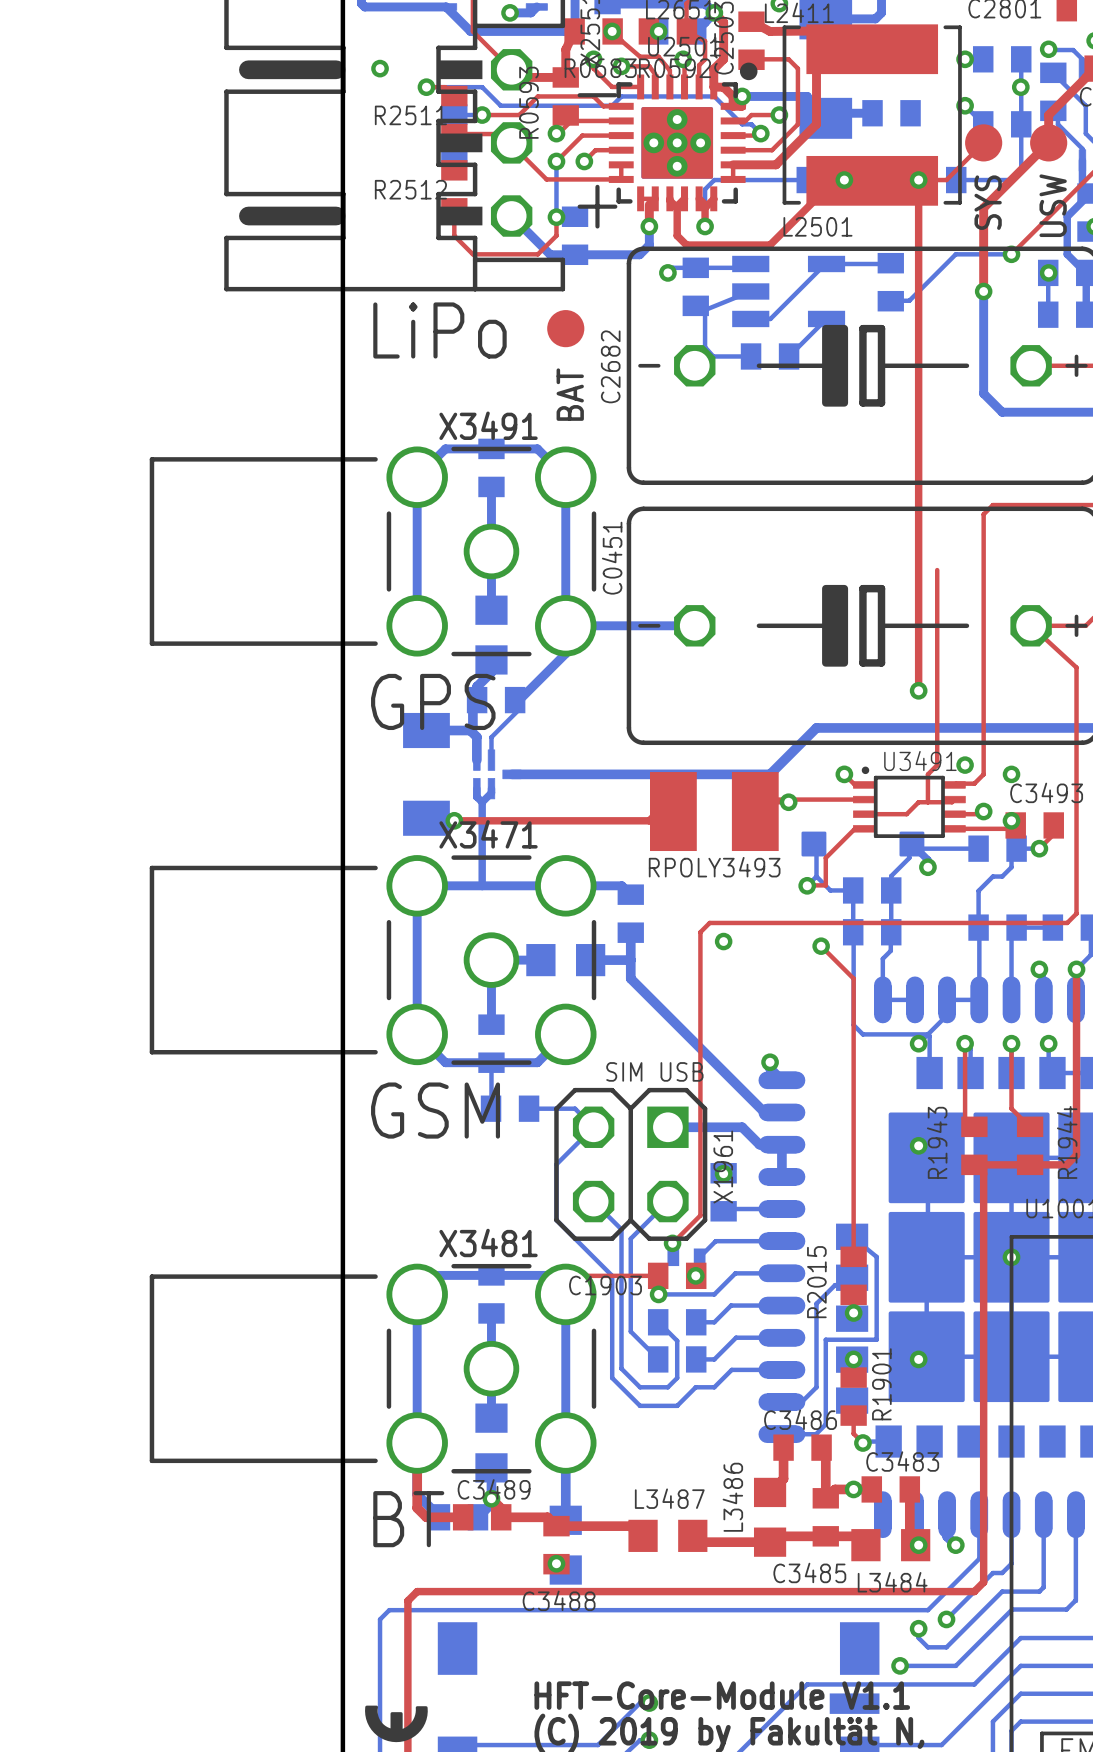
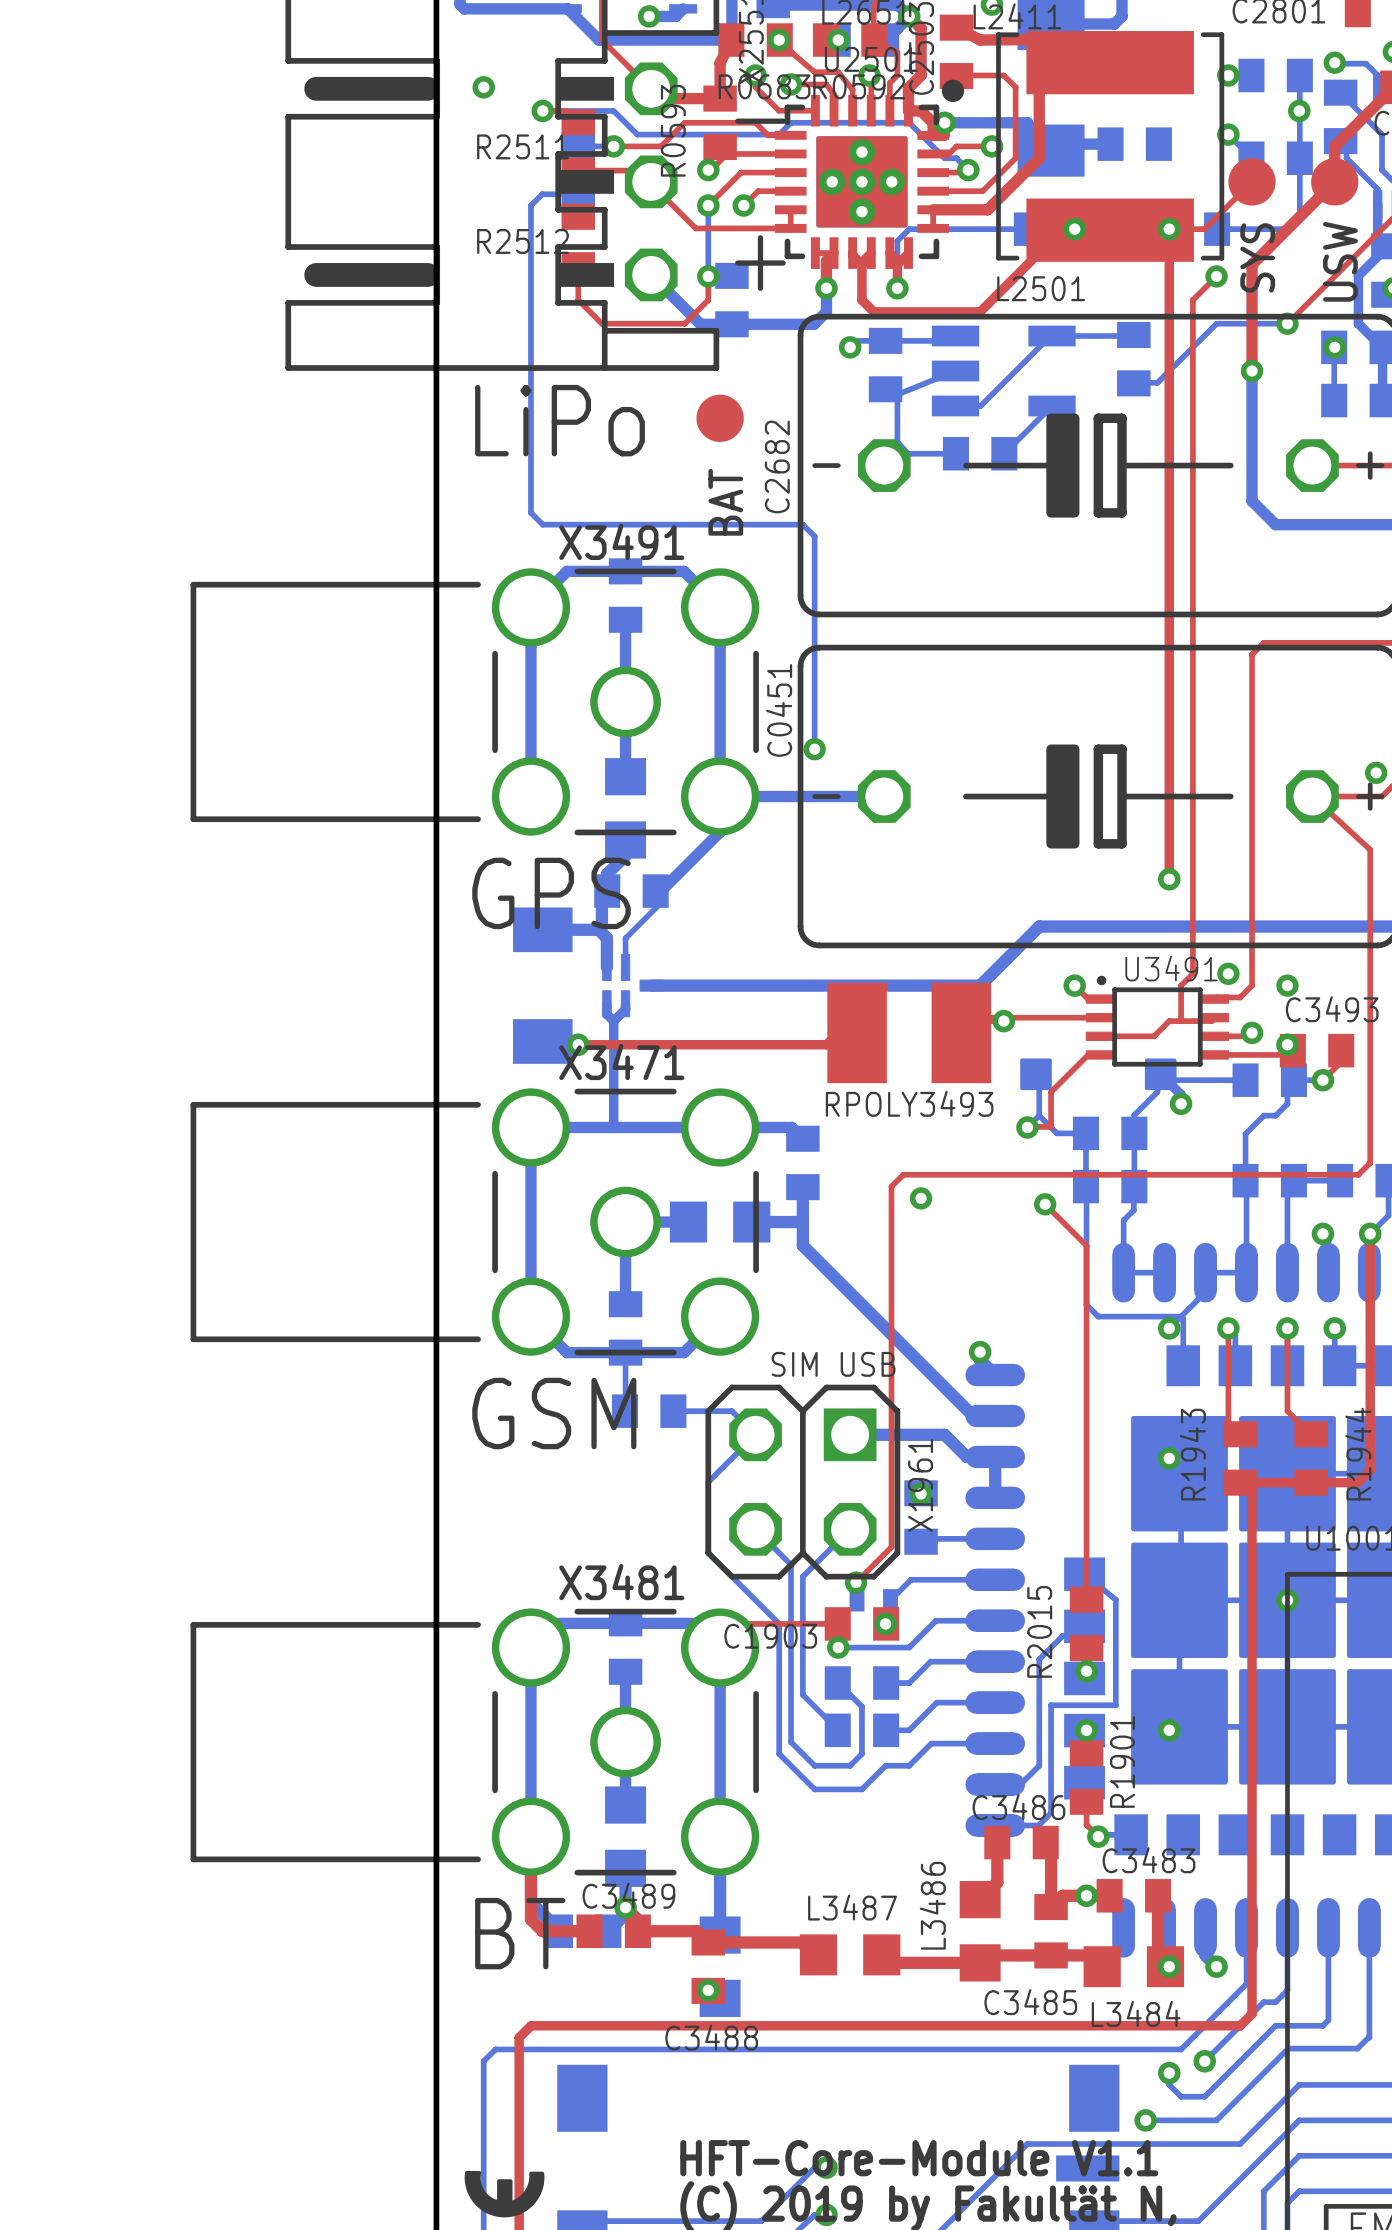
bottom track: none -> (578, 194) (542, 194) (530, 205) (530, 512) (542, 524) (802, 524) (814, 536) (814, 749)
top track: none -> (1216, 276) (1192, 300) (1192, 725)
via: none -> (1216, 276)
via: none -> (814, 749)
via: none -> (1376, 772)

